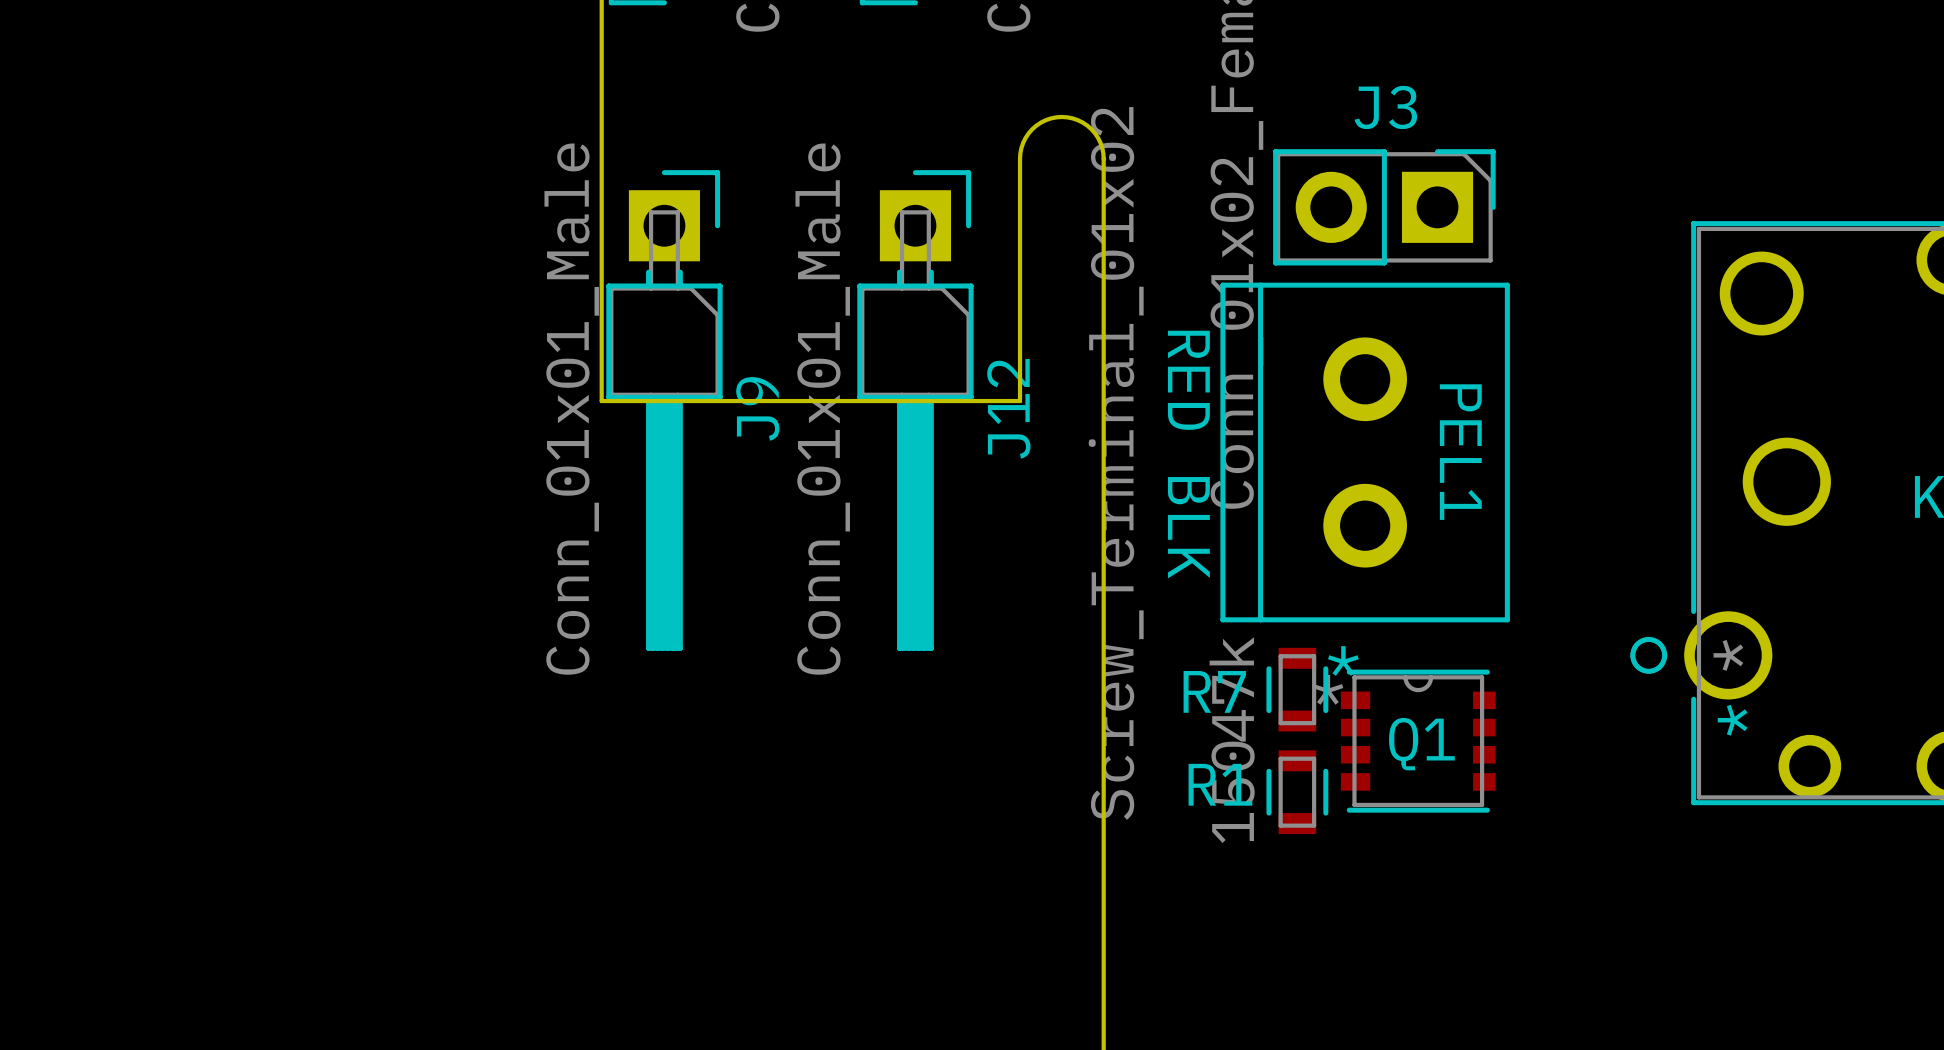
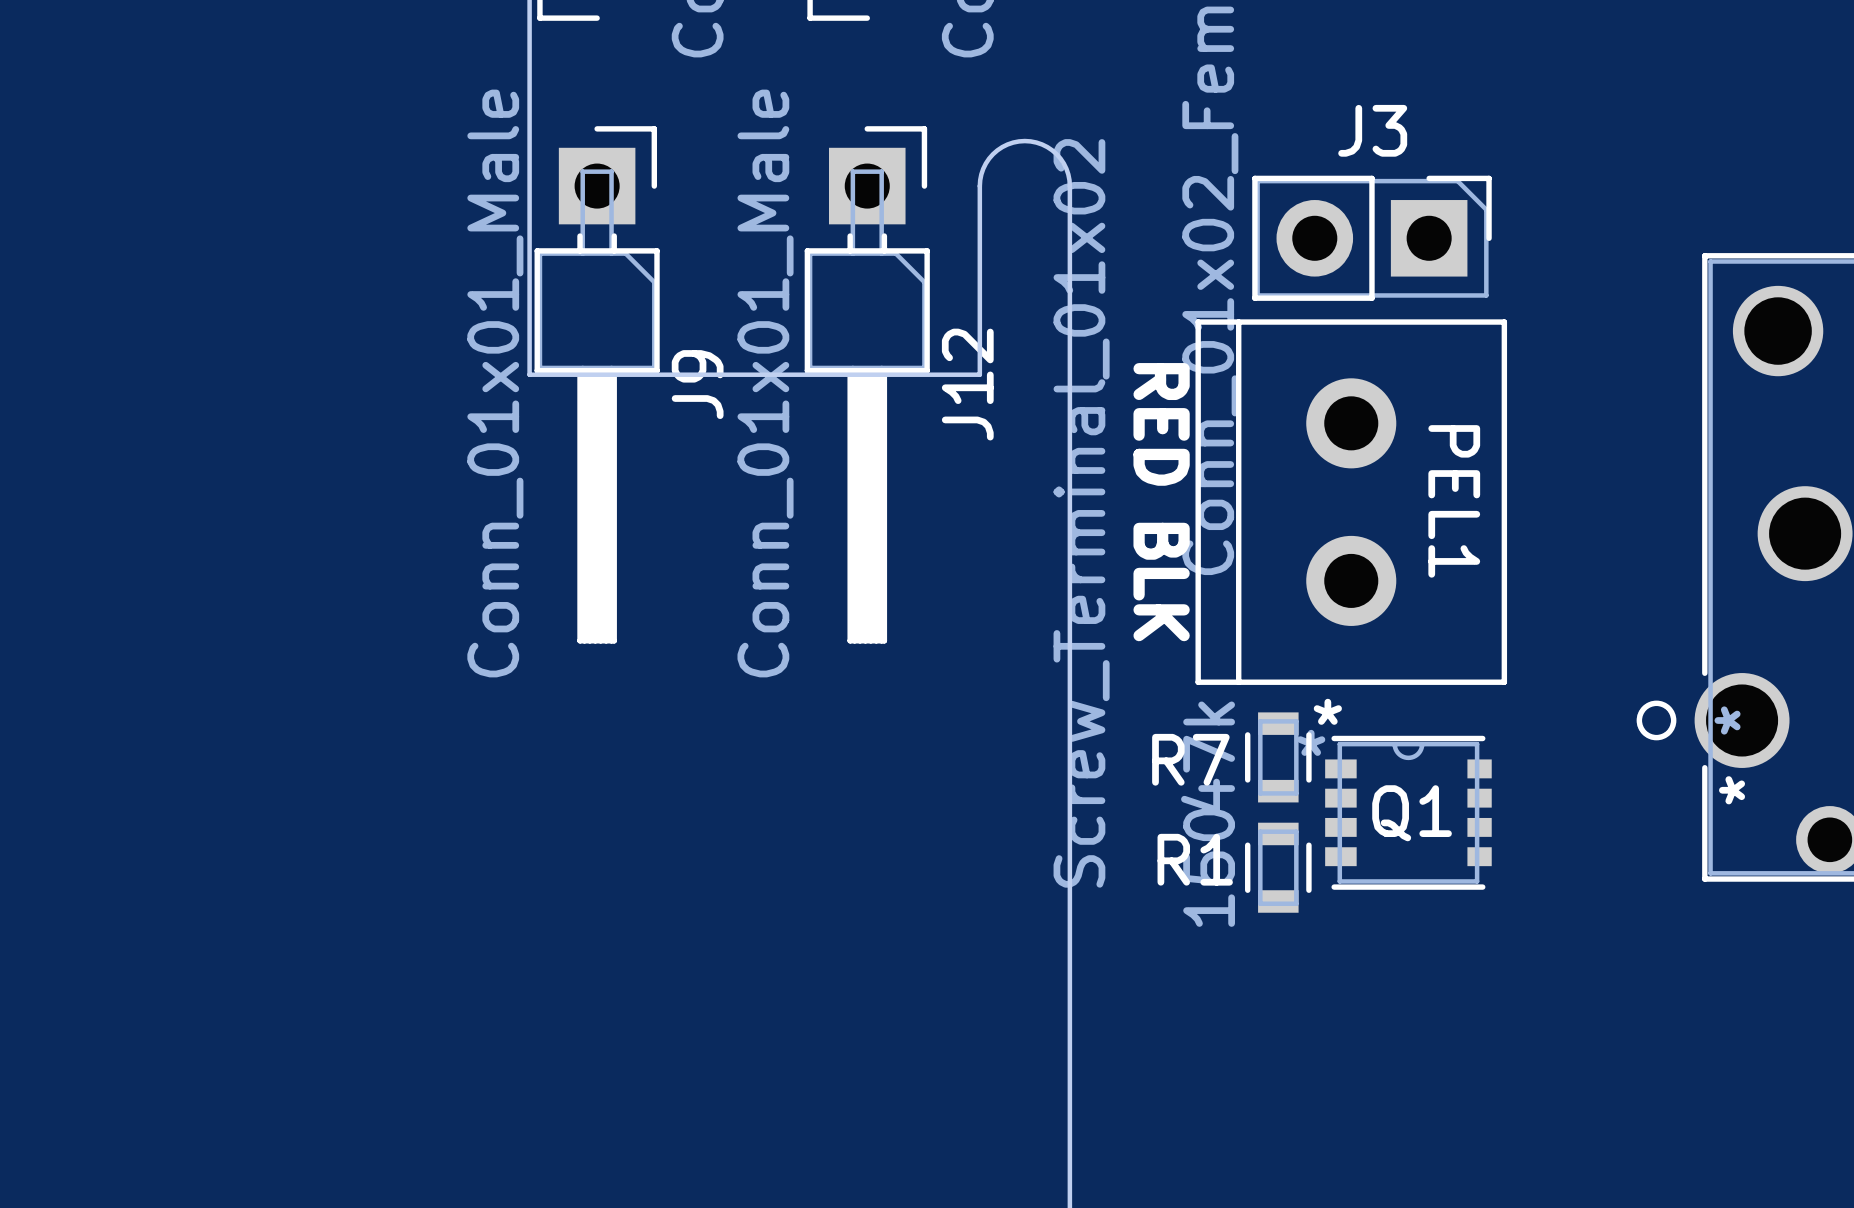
board edge: (601, 334) (601, 401) (1020, 401) (1020, 334) -> (529, 374) (979, 374)
J9 position: (664, 410) -> (597, 384)
J12 position: (915, 410) -> (867, 384)

